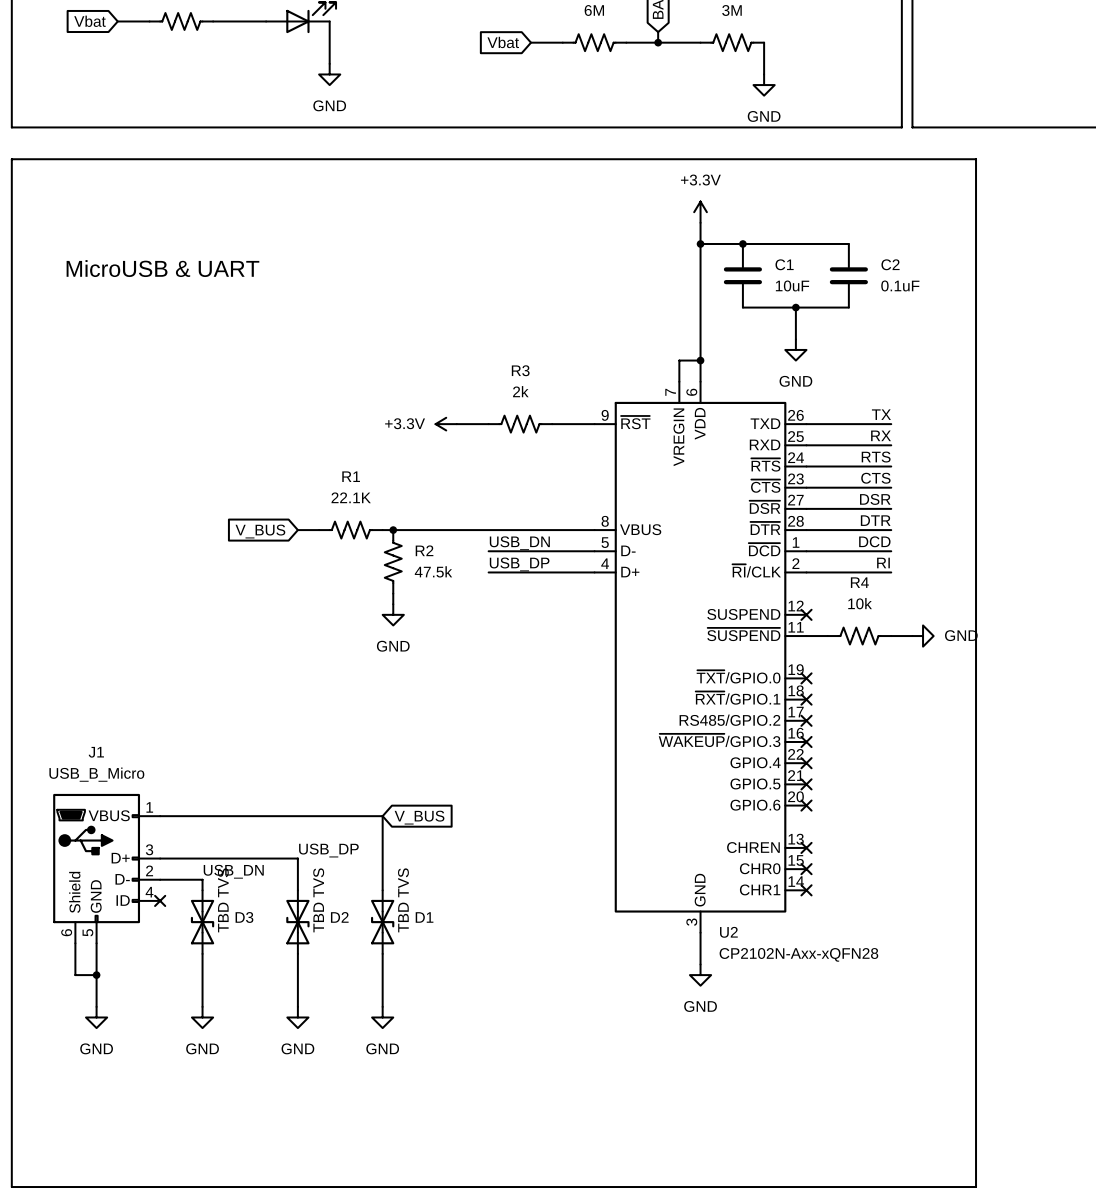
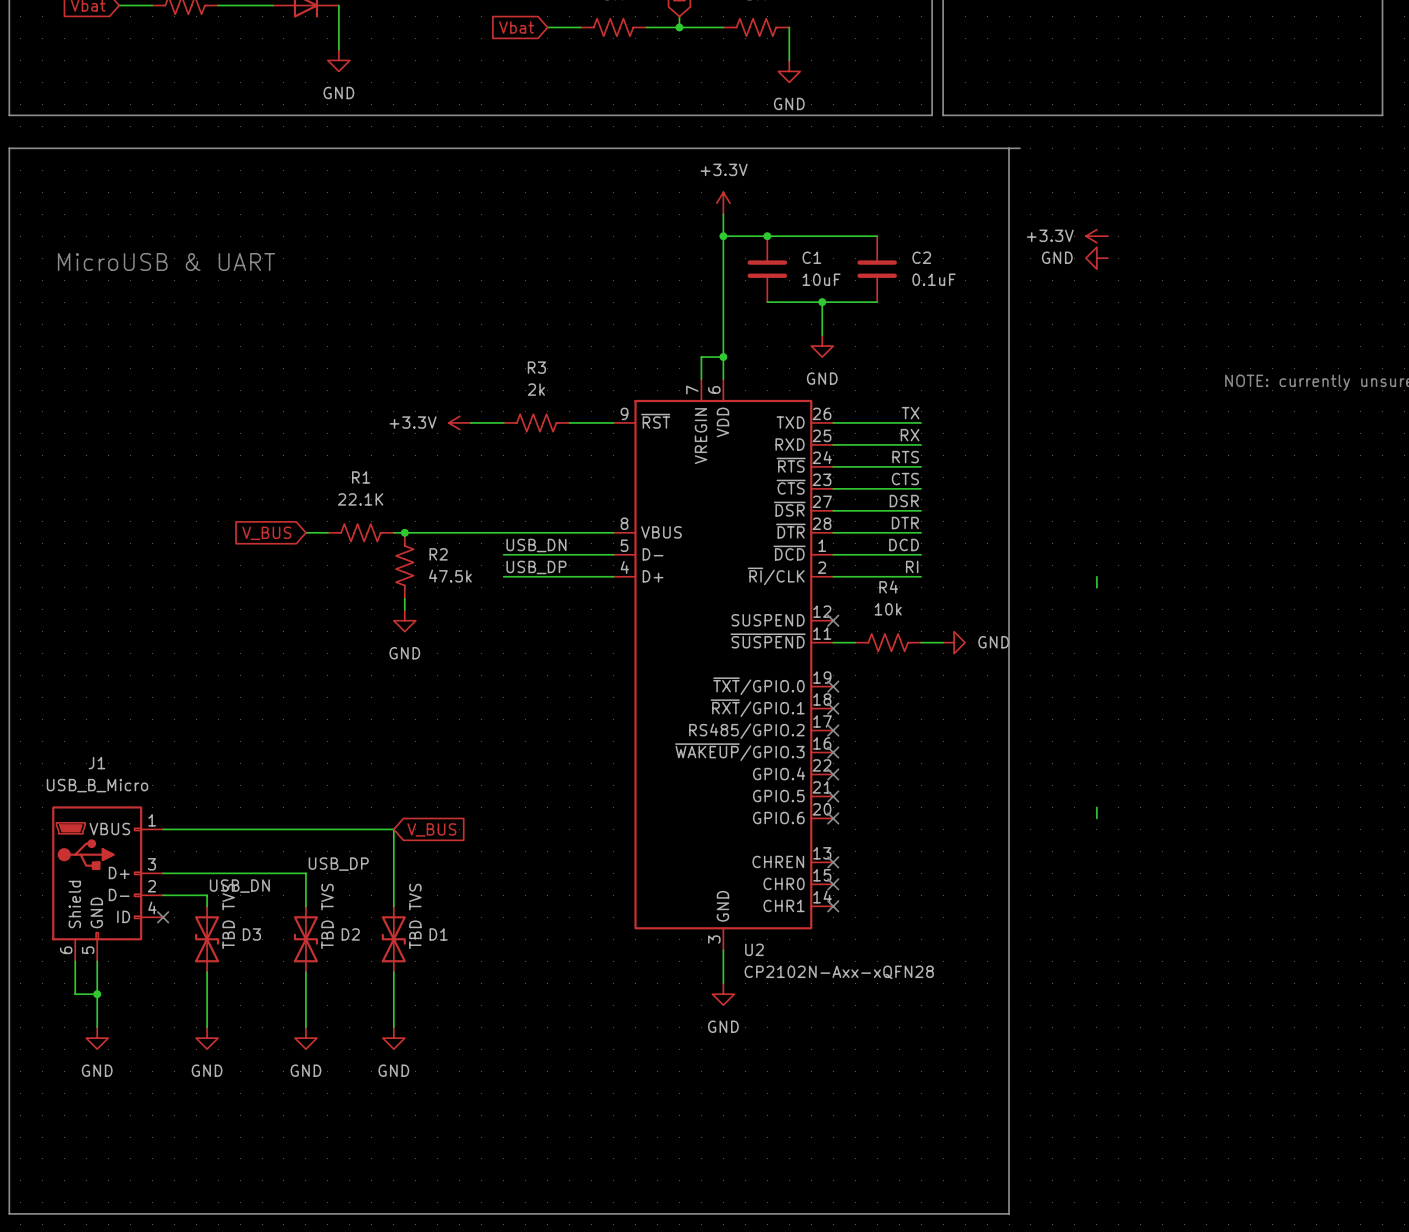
line: none -> (1009, 148) (1020, 148)
power symbol: none -> +3.3V (1096, 236)
power symbol: none -> GND (1096, 258)
wire: none -> (1096, 576) (1096, 587)
wire: none -> (1096, 807) (1096, 818)

